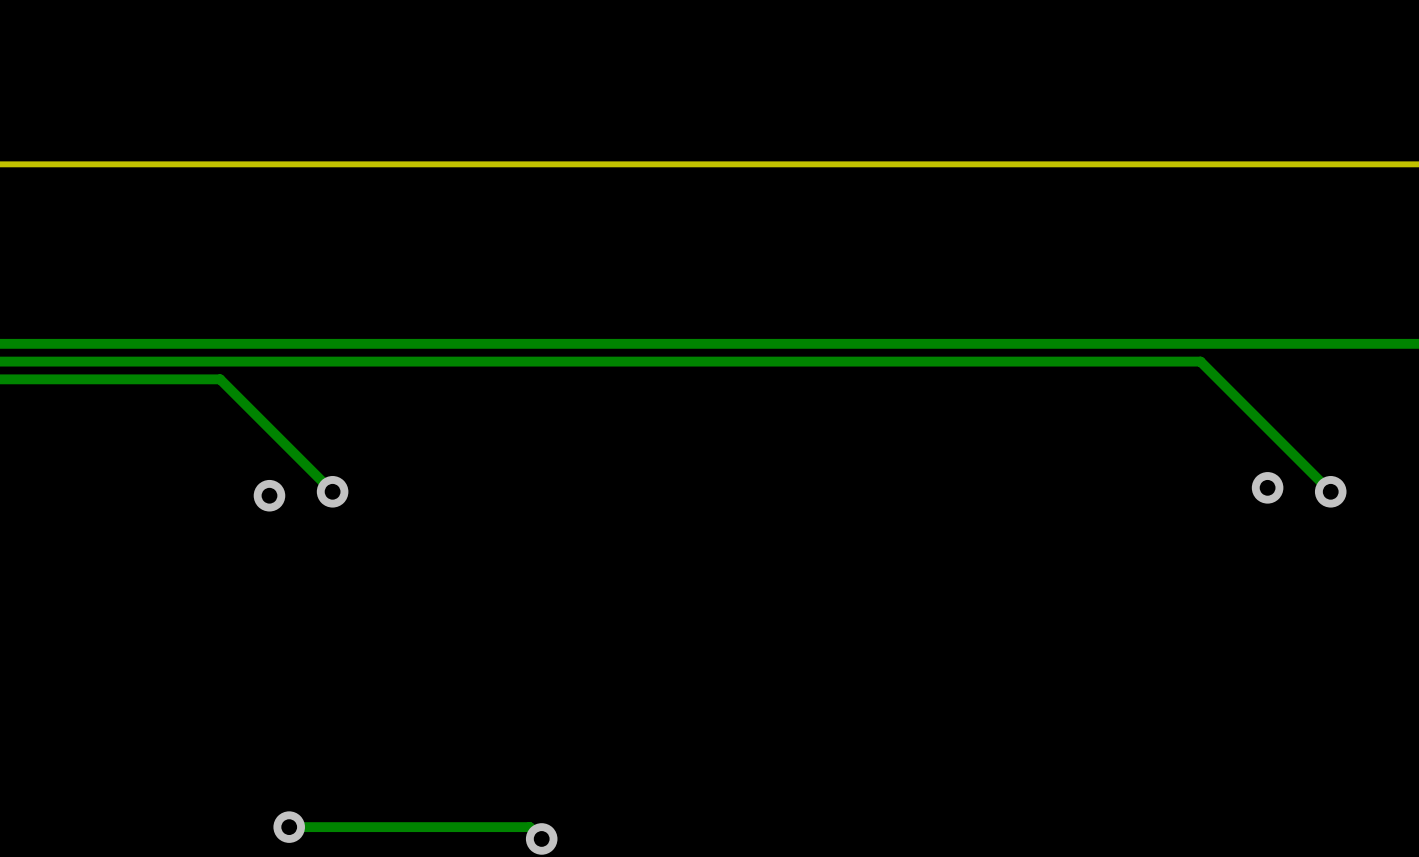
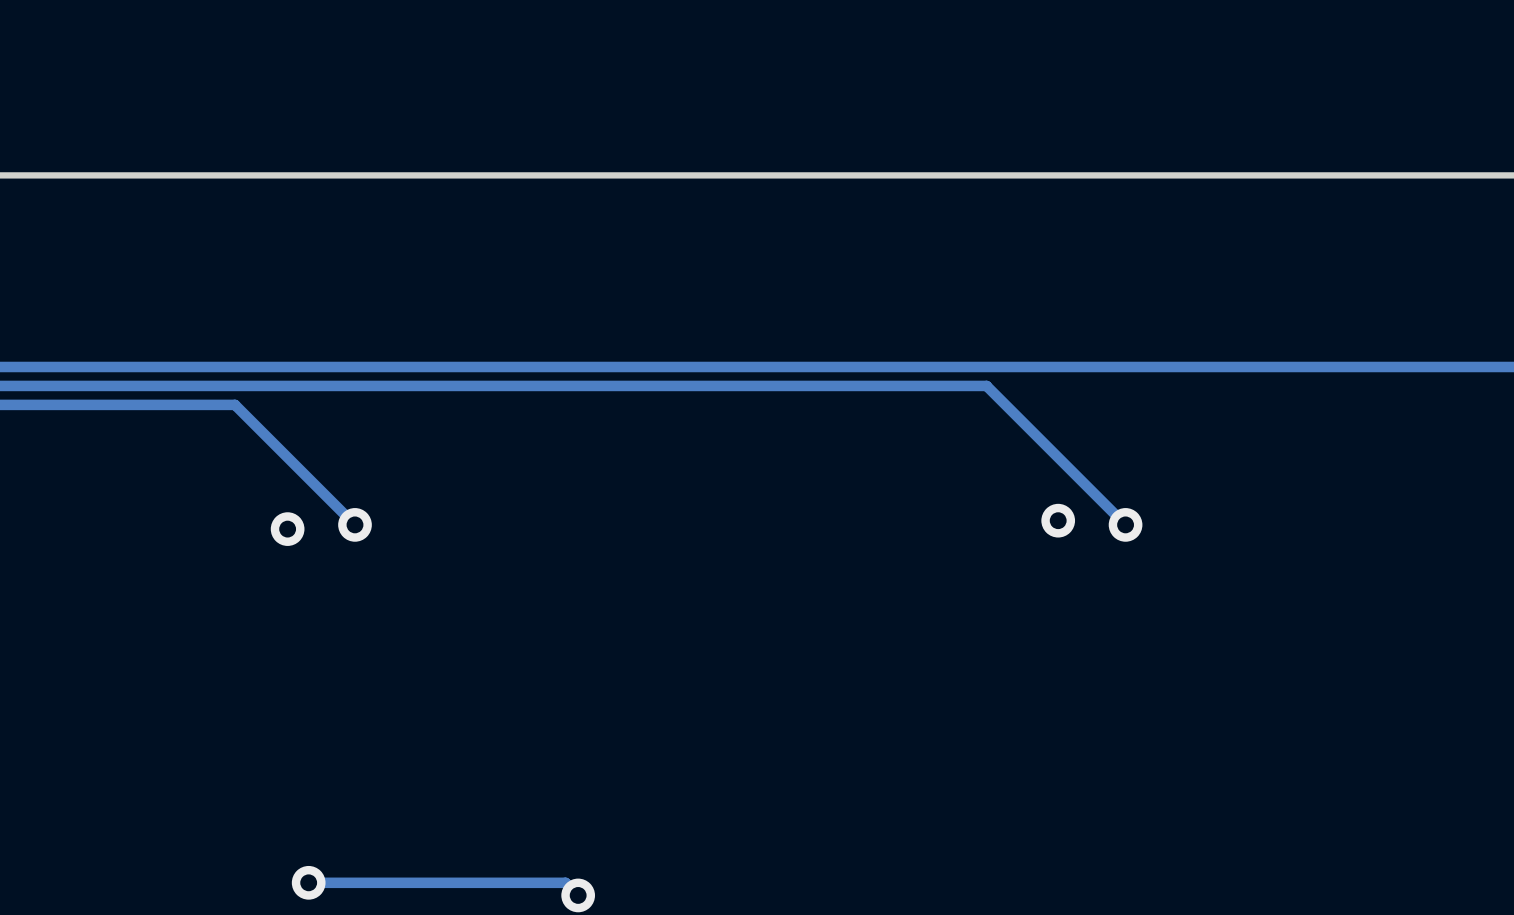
track: (924, 361) (1200, 361) (1330, 491) -> (986, 385) (1125, 524)
via: none -> (1058, 520)
via: (1267, 487) -> none
via: none -> (1125, 524)
via: (1330, 491) -> none

